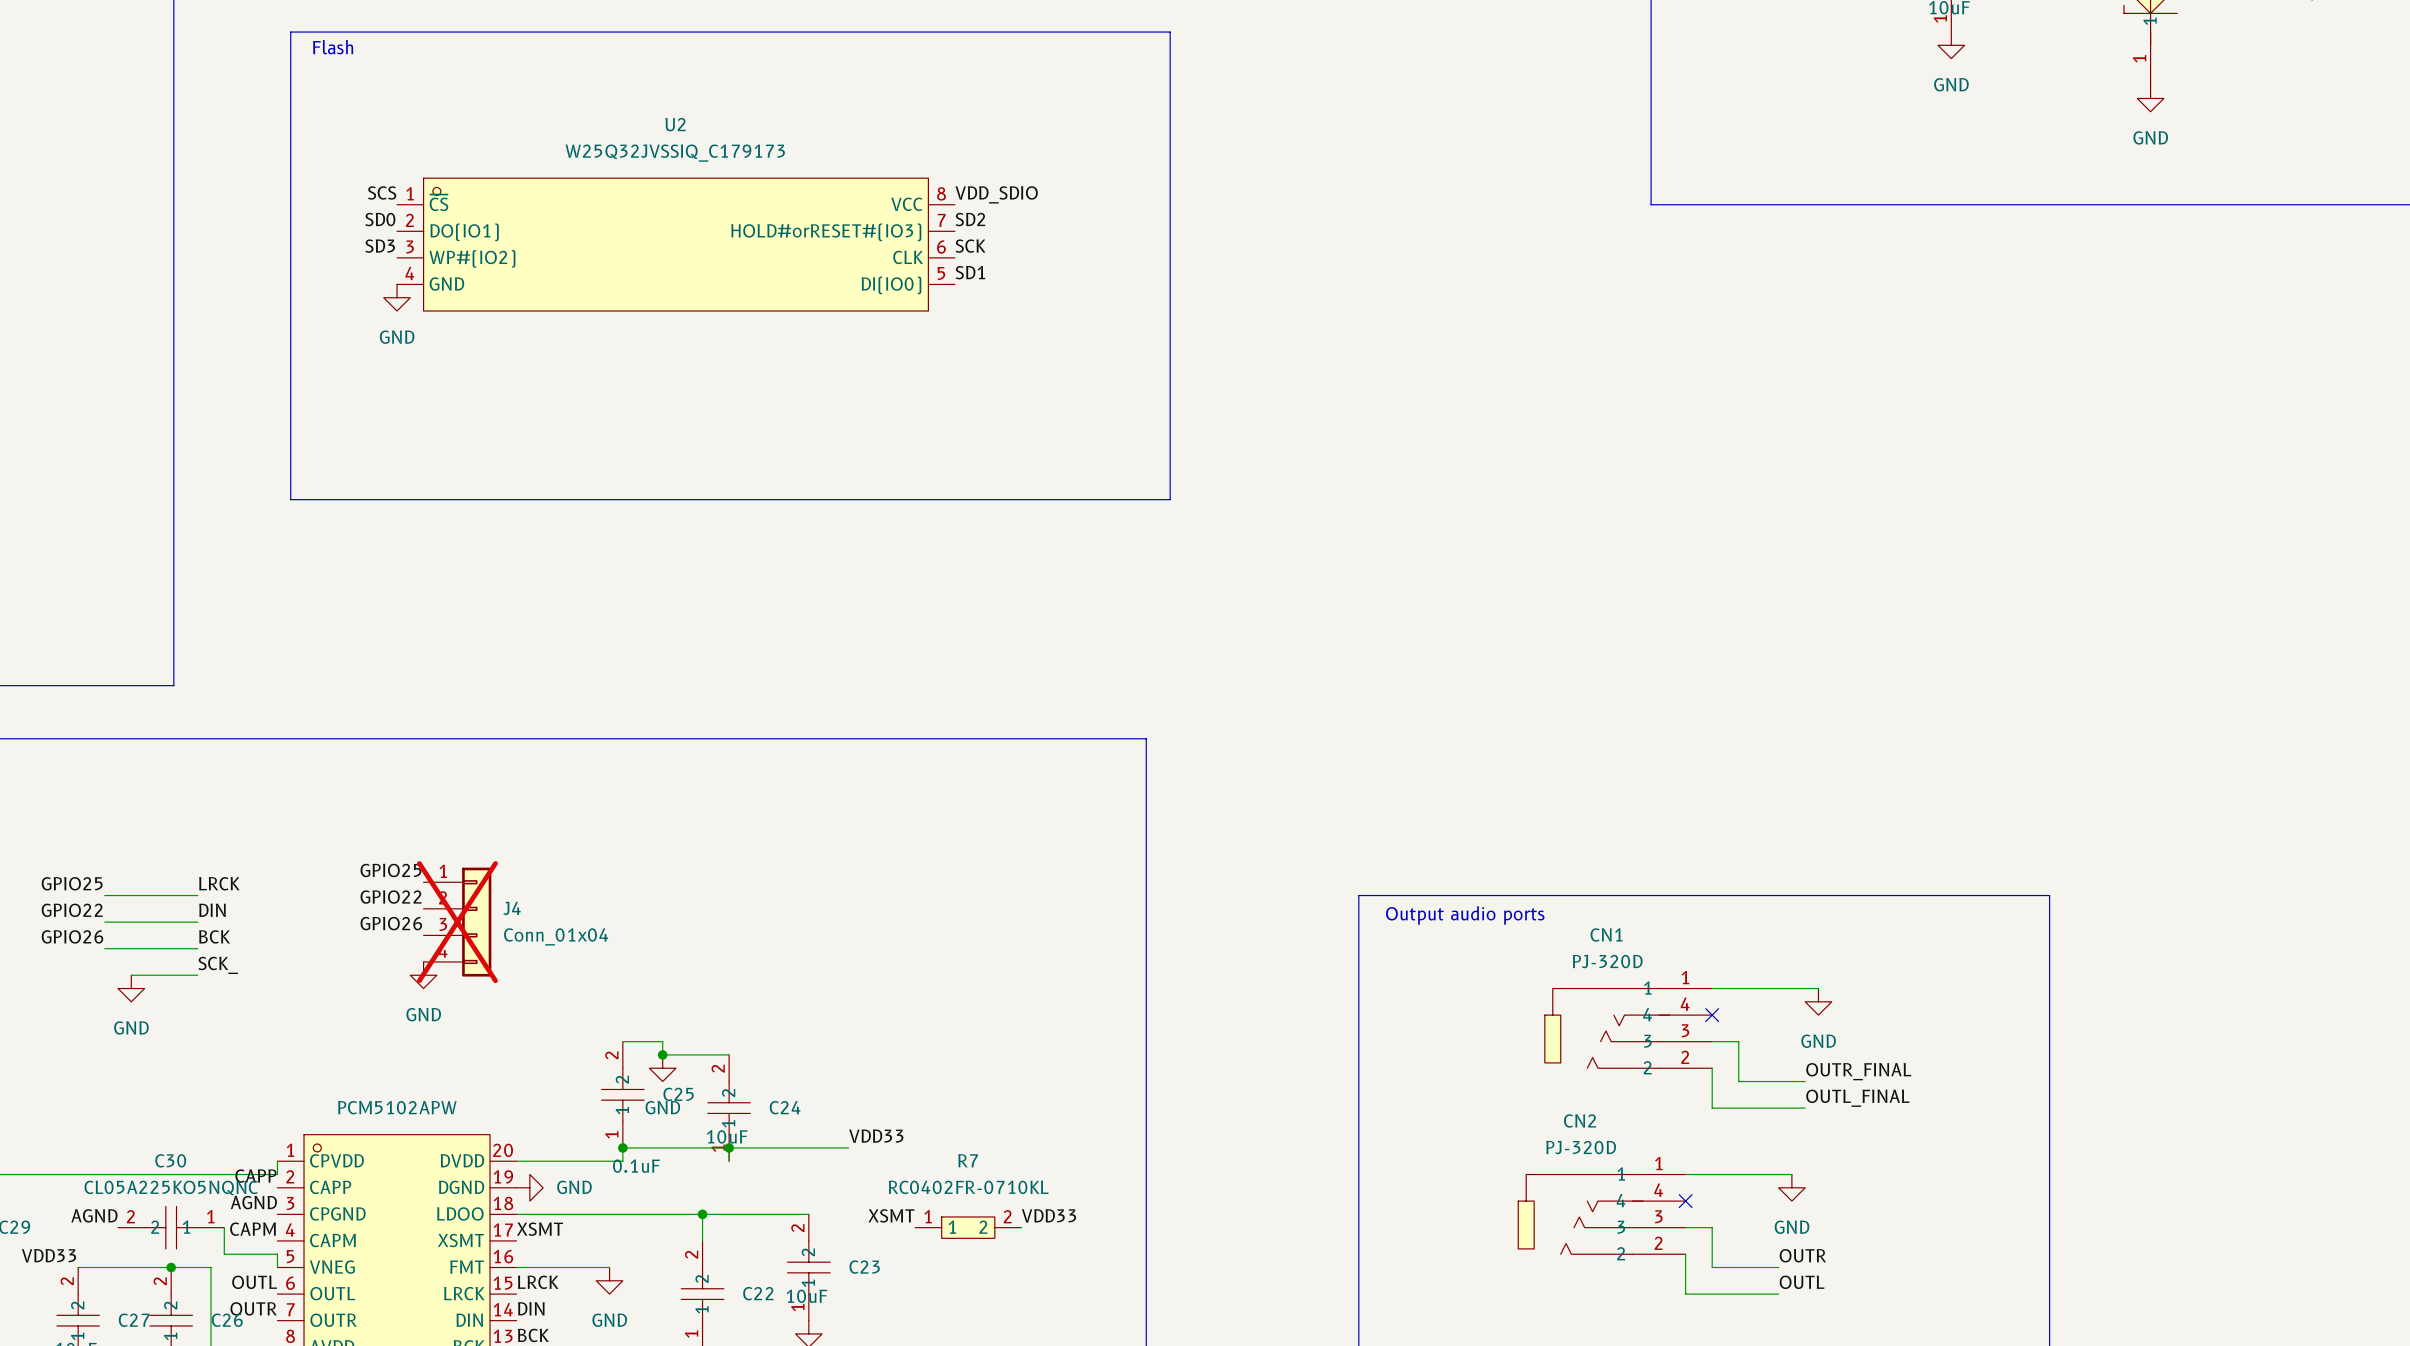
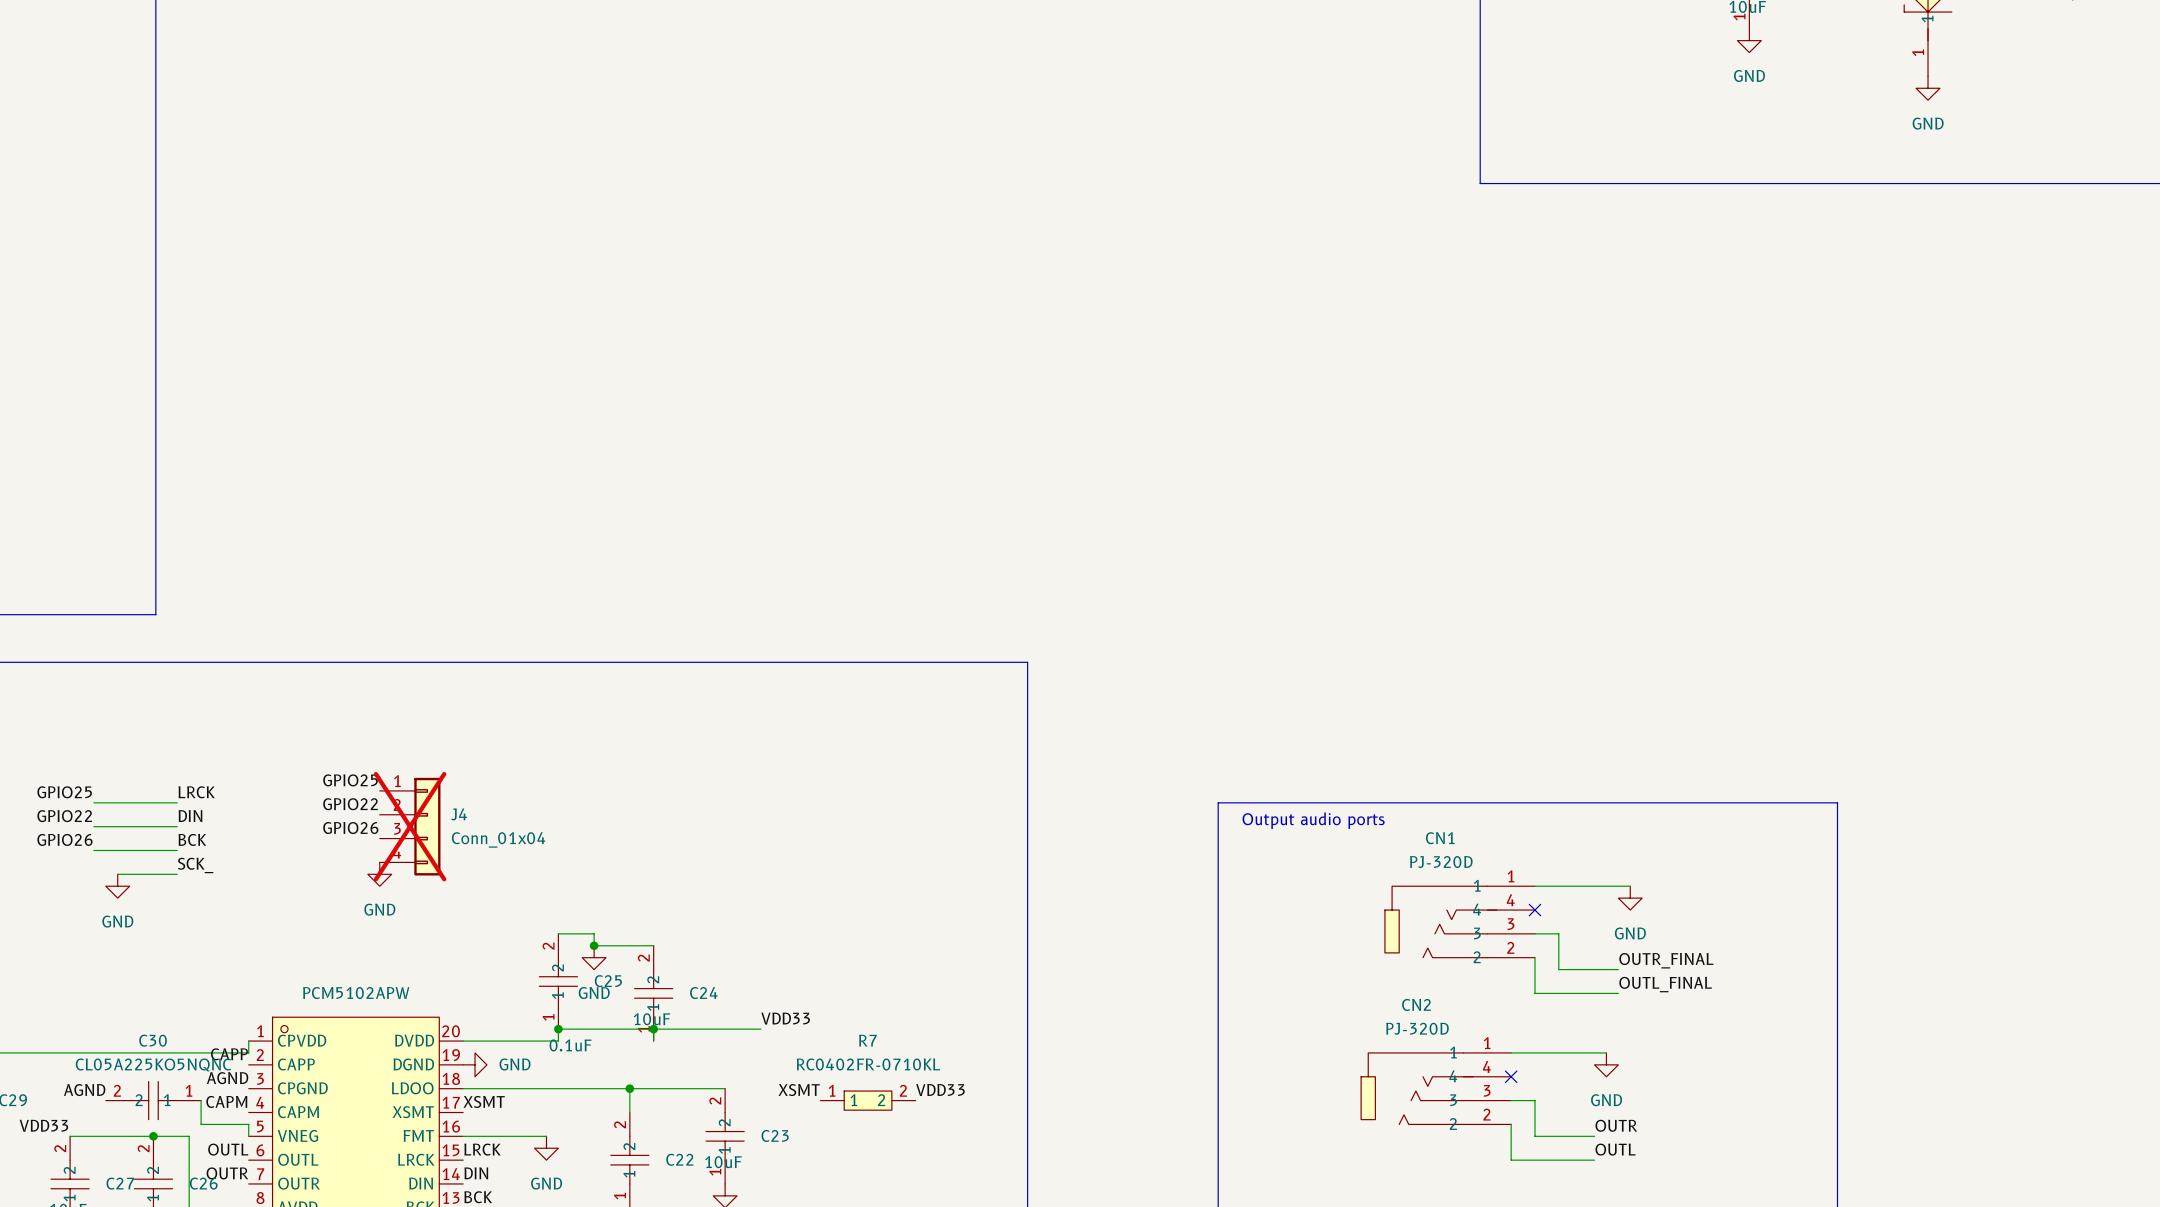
line: (290, 32) (1170, 32) (1170, 499) (290, 499) (290, 32) -> none
text: Flash (333, 47) -> none
label: SCS (382, 192) -> none
label: VDD_SDIO (996, 194) -> none
label: SD0 (380, 219) -> none
label: SD2 (970, 219) -> none
U2: W25Q32JVSSIQ_C179173 (675, 244) -> none
label: SD3 (380, 246) -> none
label: SCK (970, 246) -> none
label: SD1 (970, 272) -> none
power symbol: GND (397, 297) -> none

